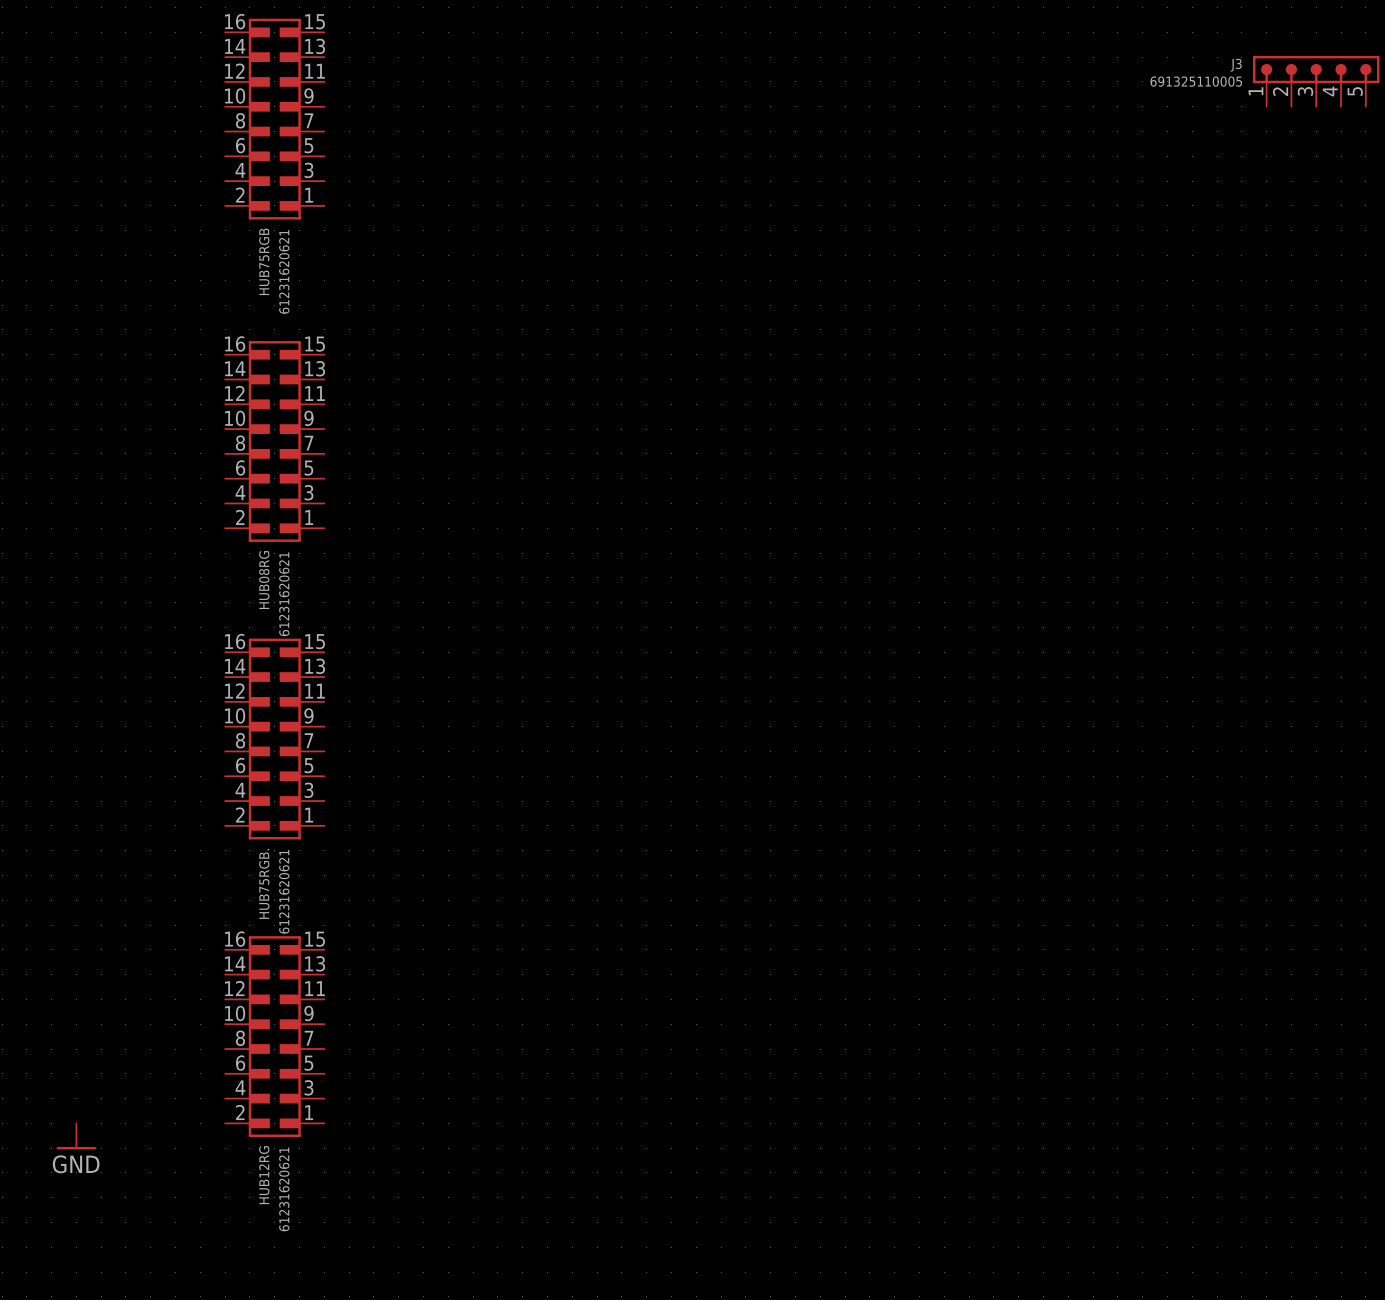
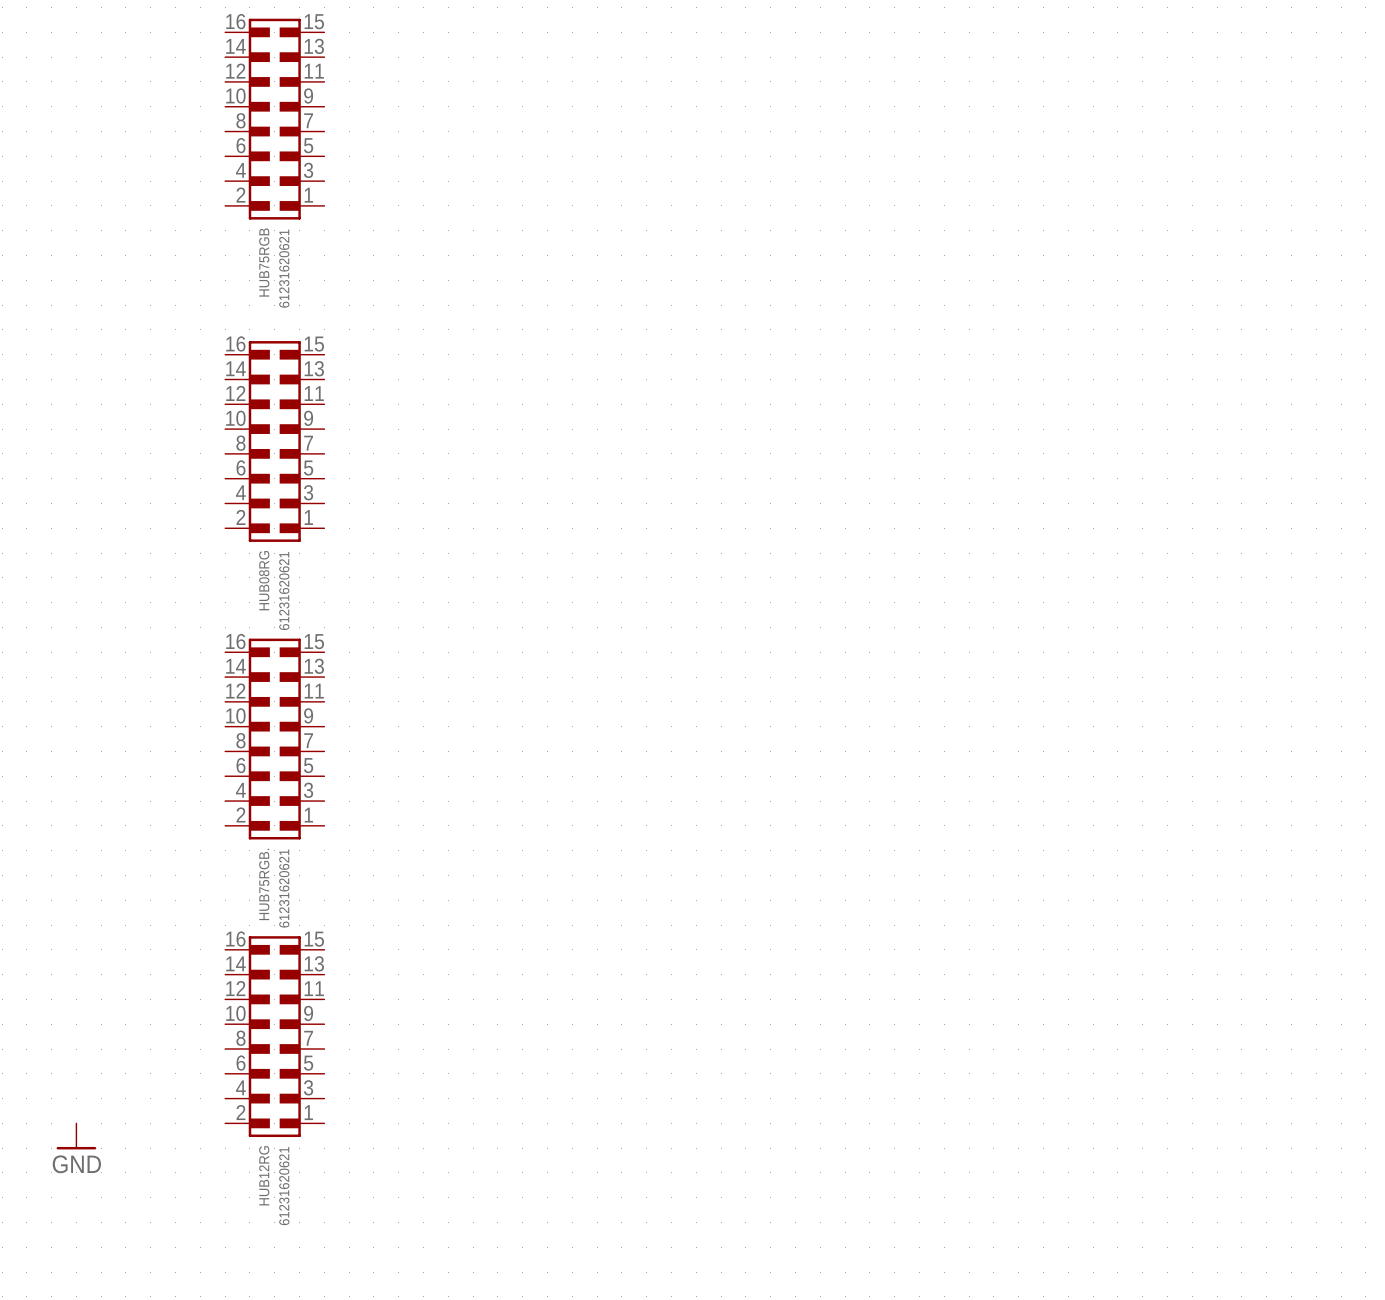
J3: 691325110005 (1316, 81) -> none

